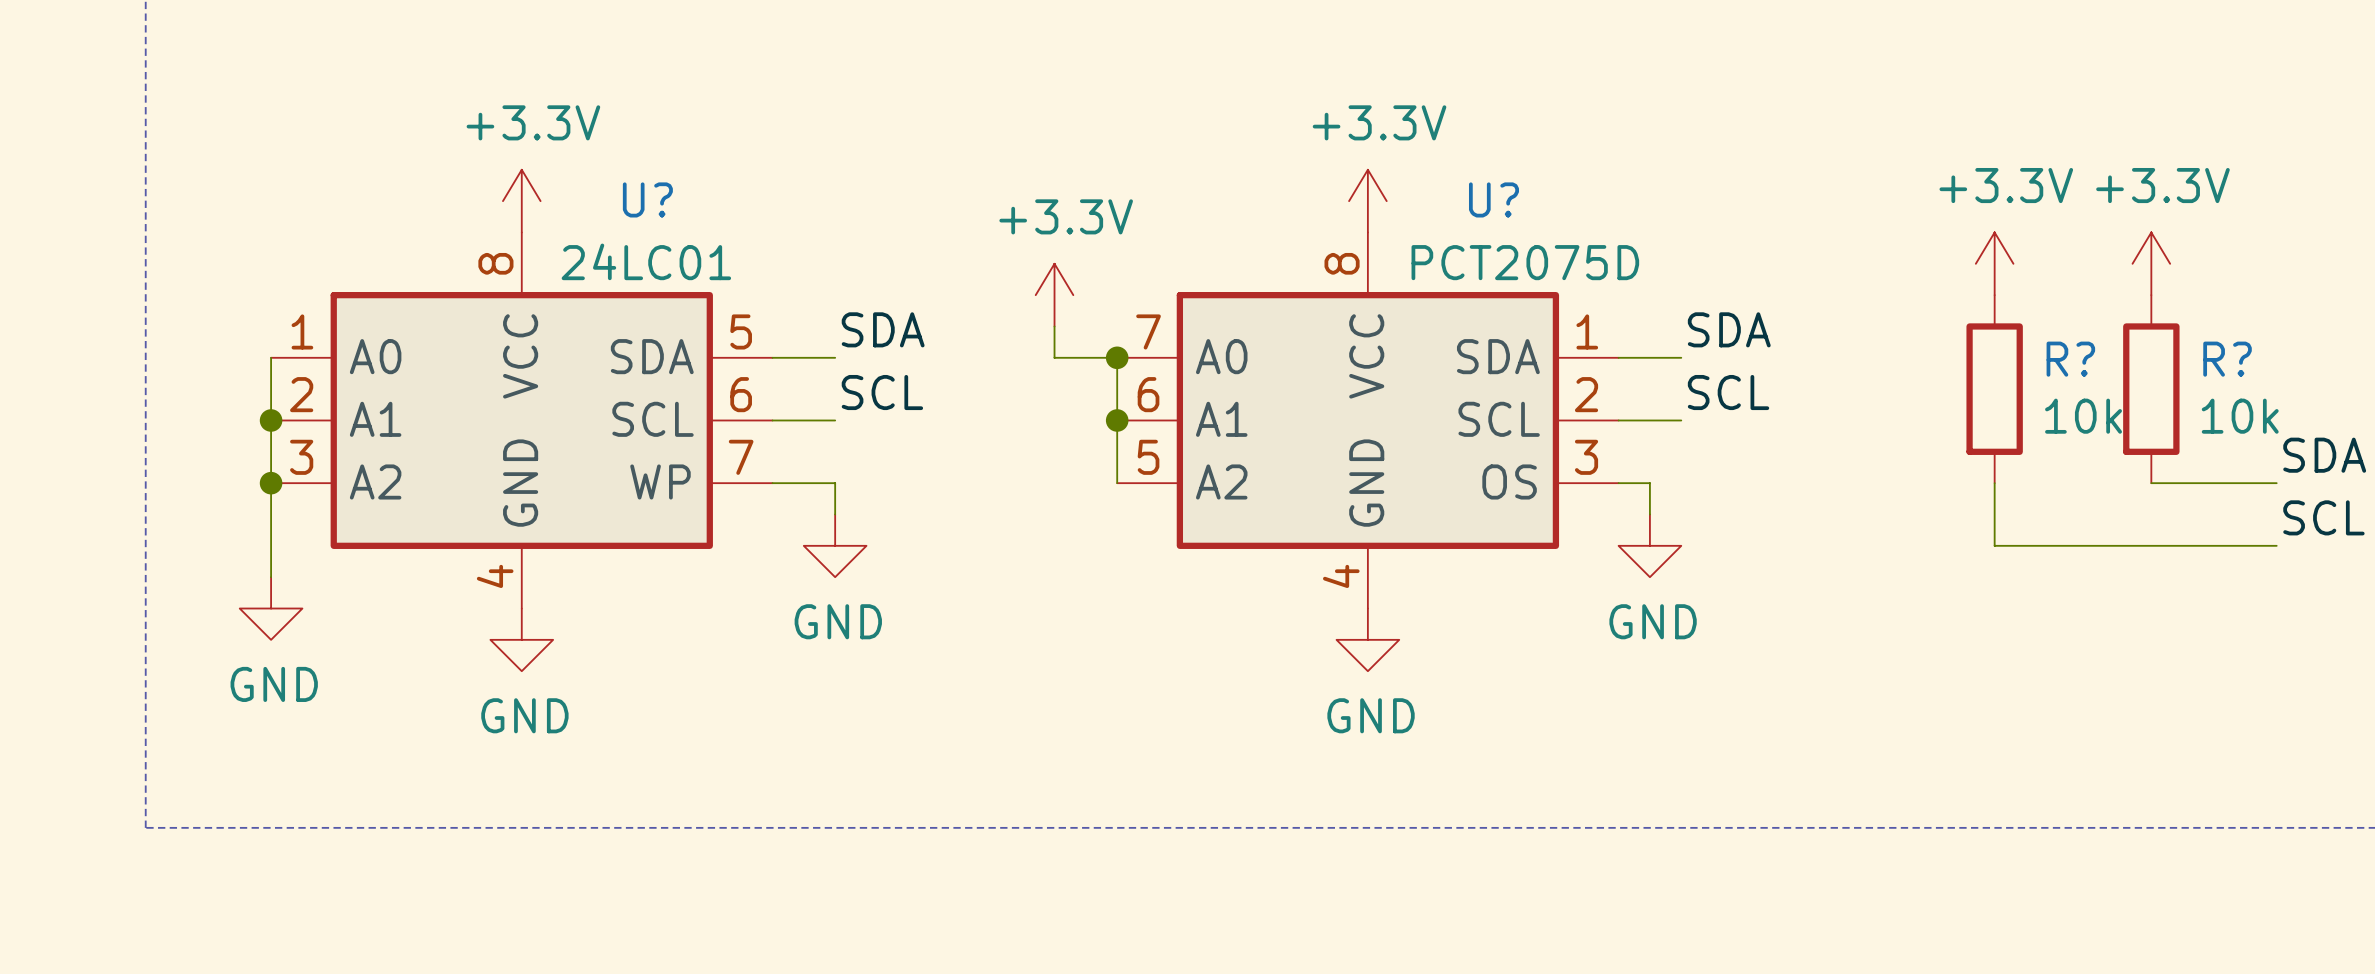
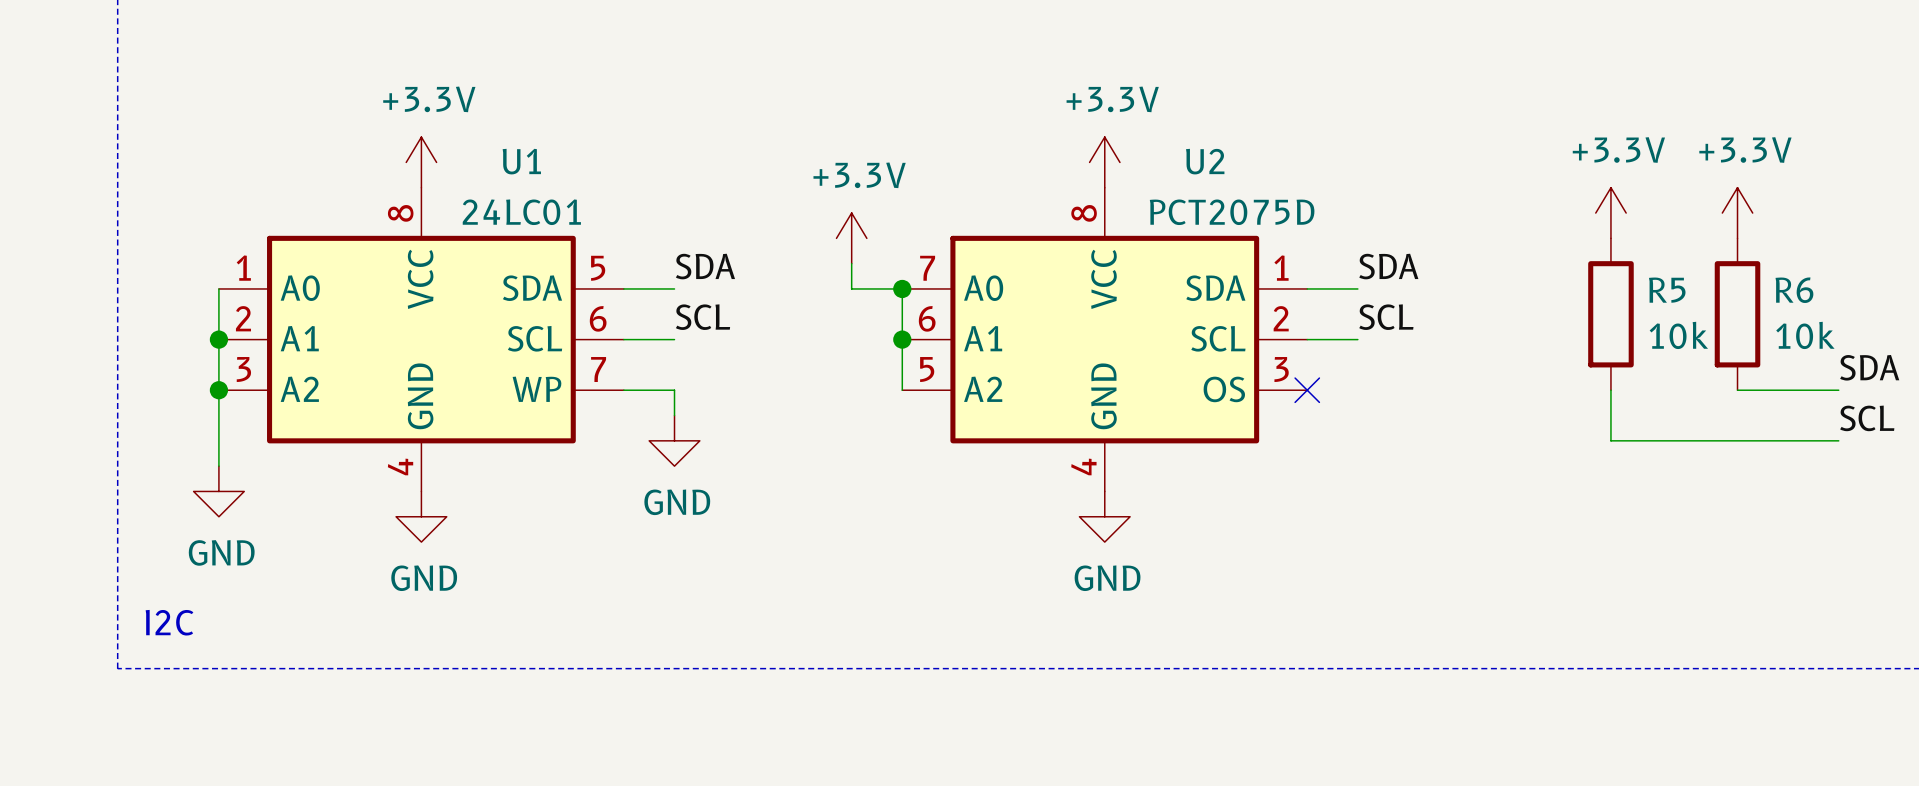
U? name: U? (647, 199) -> U1 (521, 161)
U? name: U? (1493, 199) -> U2 (1205, 161)
R? name: R? (2070, 359) -> R5 (1667, 290)
R? name: R? (2227, 359) -> R6 (1794, 290)
wire: (1618, 483) (1649, 483) (1649, 514) -> none
no-connect mark: none -> (1307, 390)
power symbol: GND (1649, 545) -> none
text: none -> I2C (169, 622)

